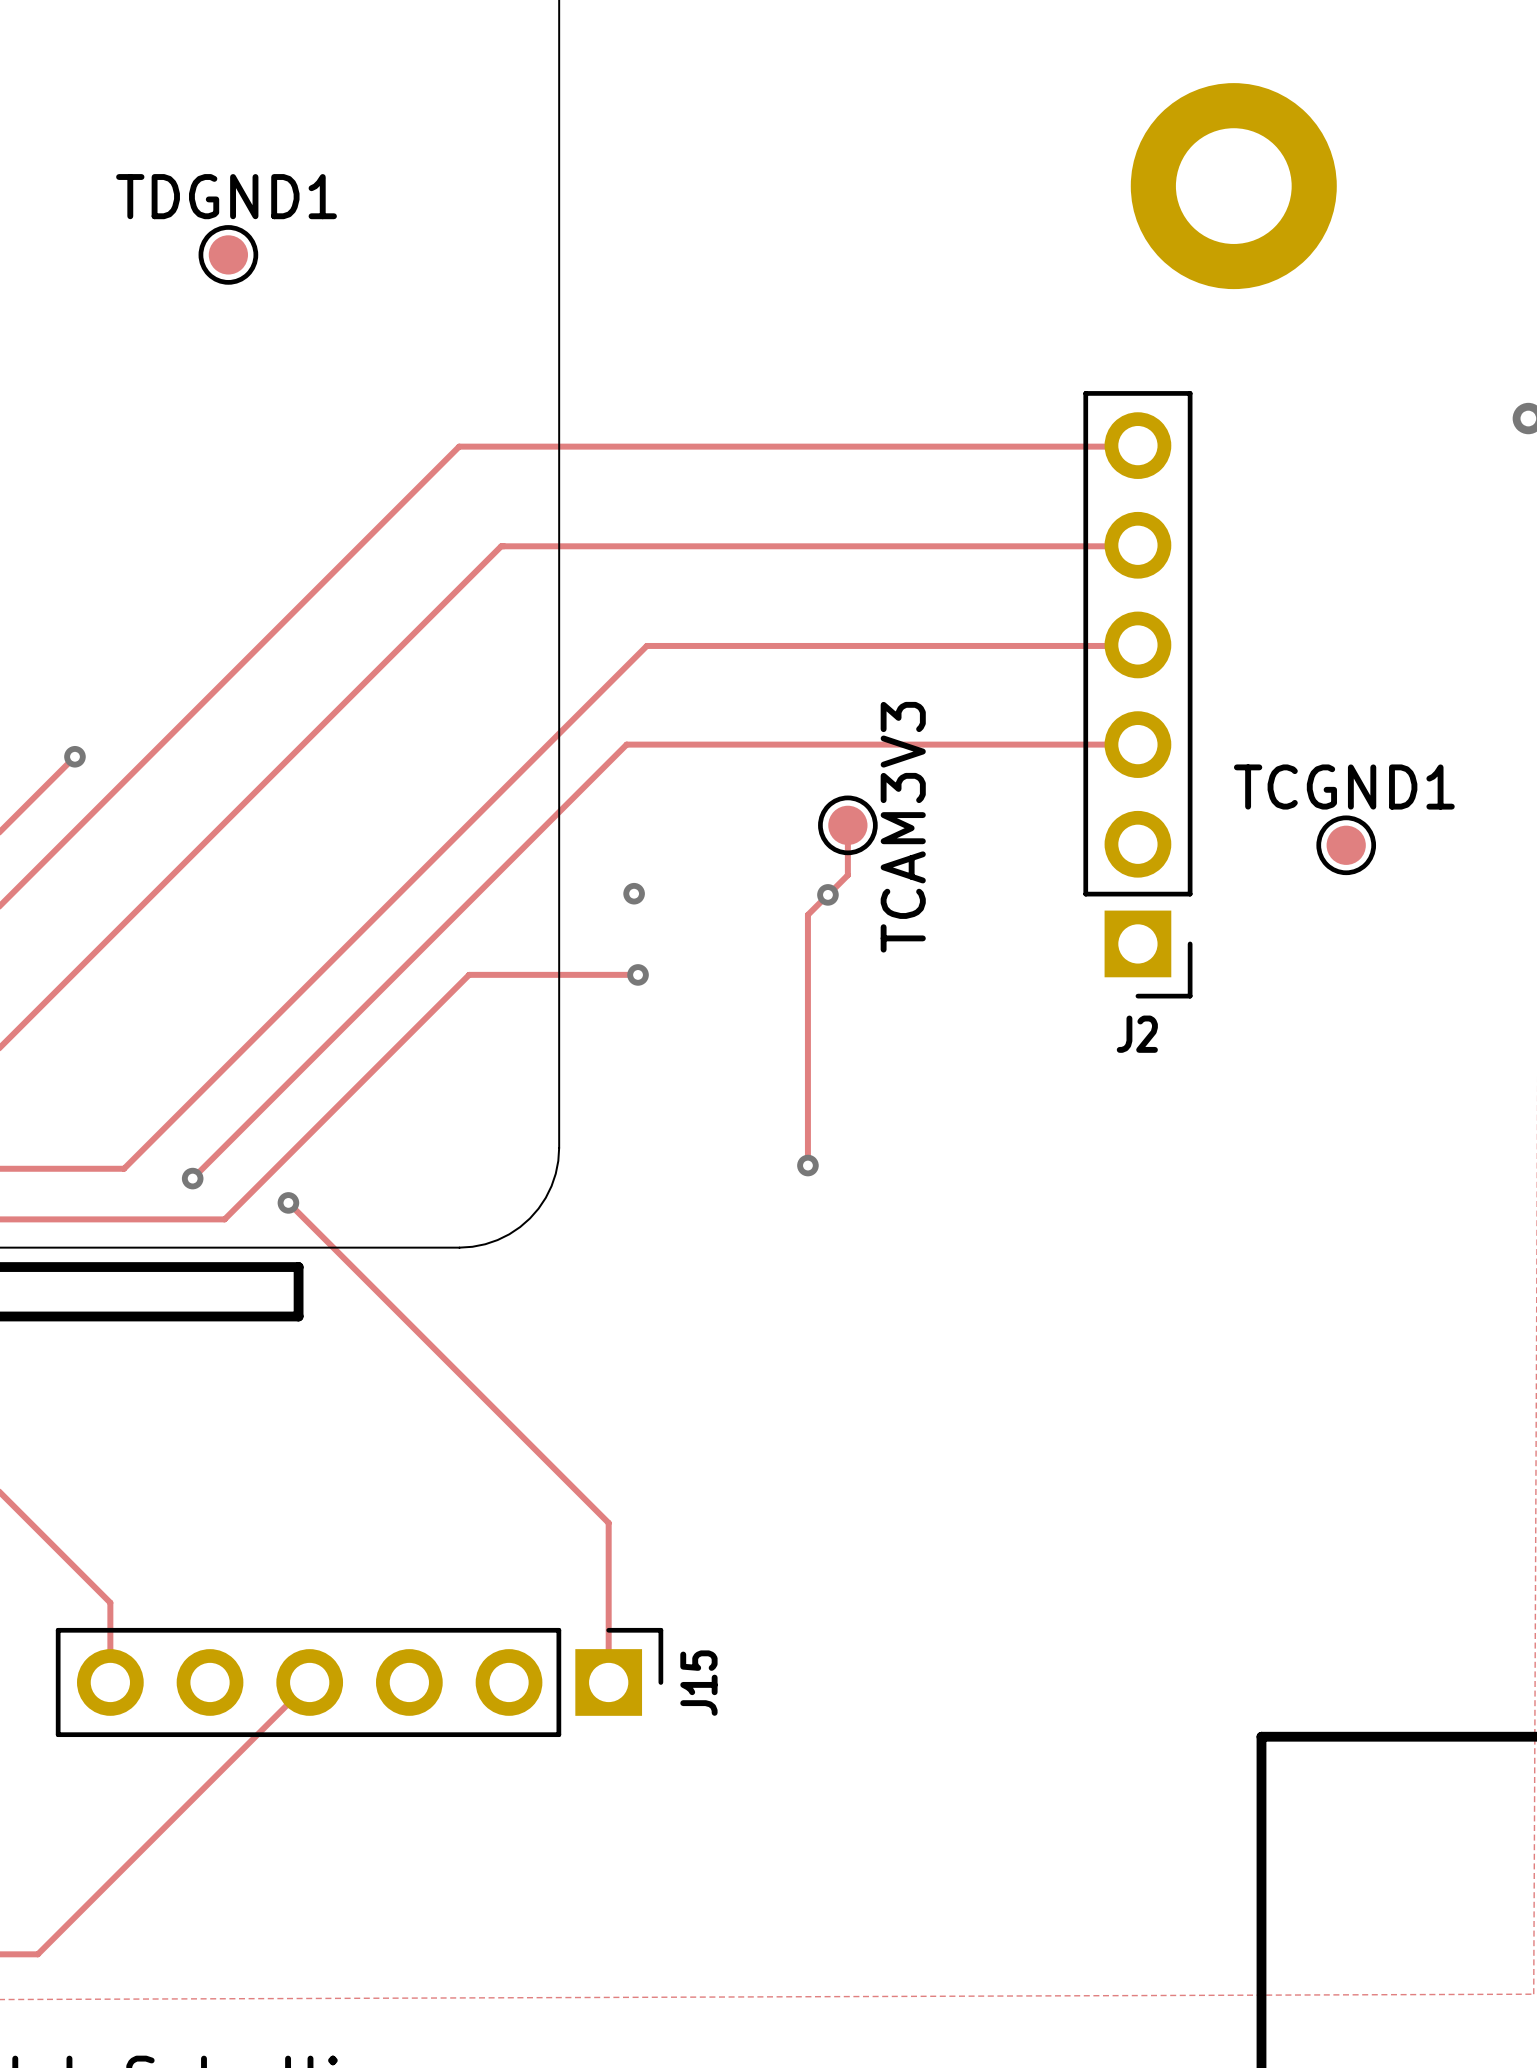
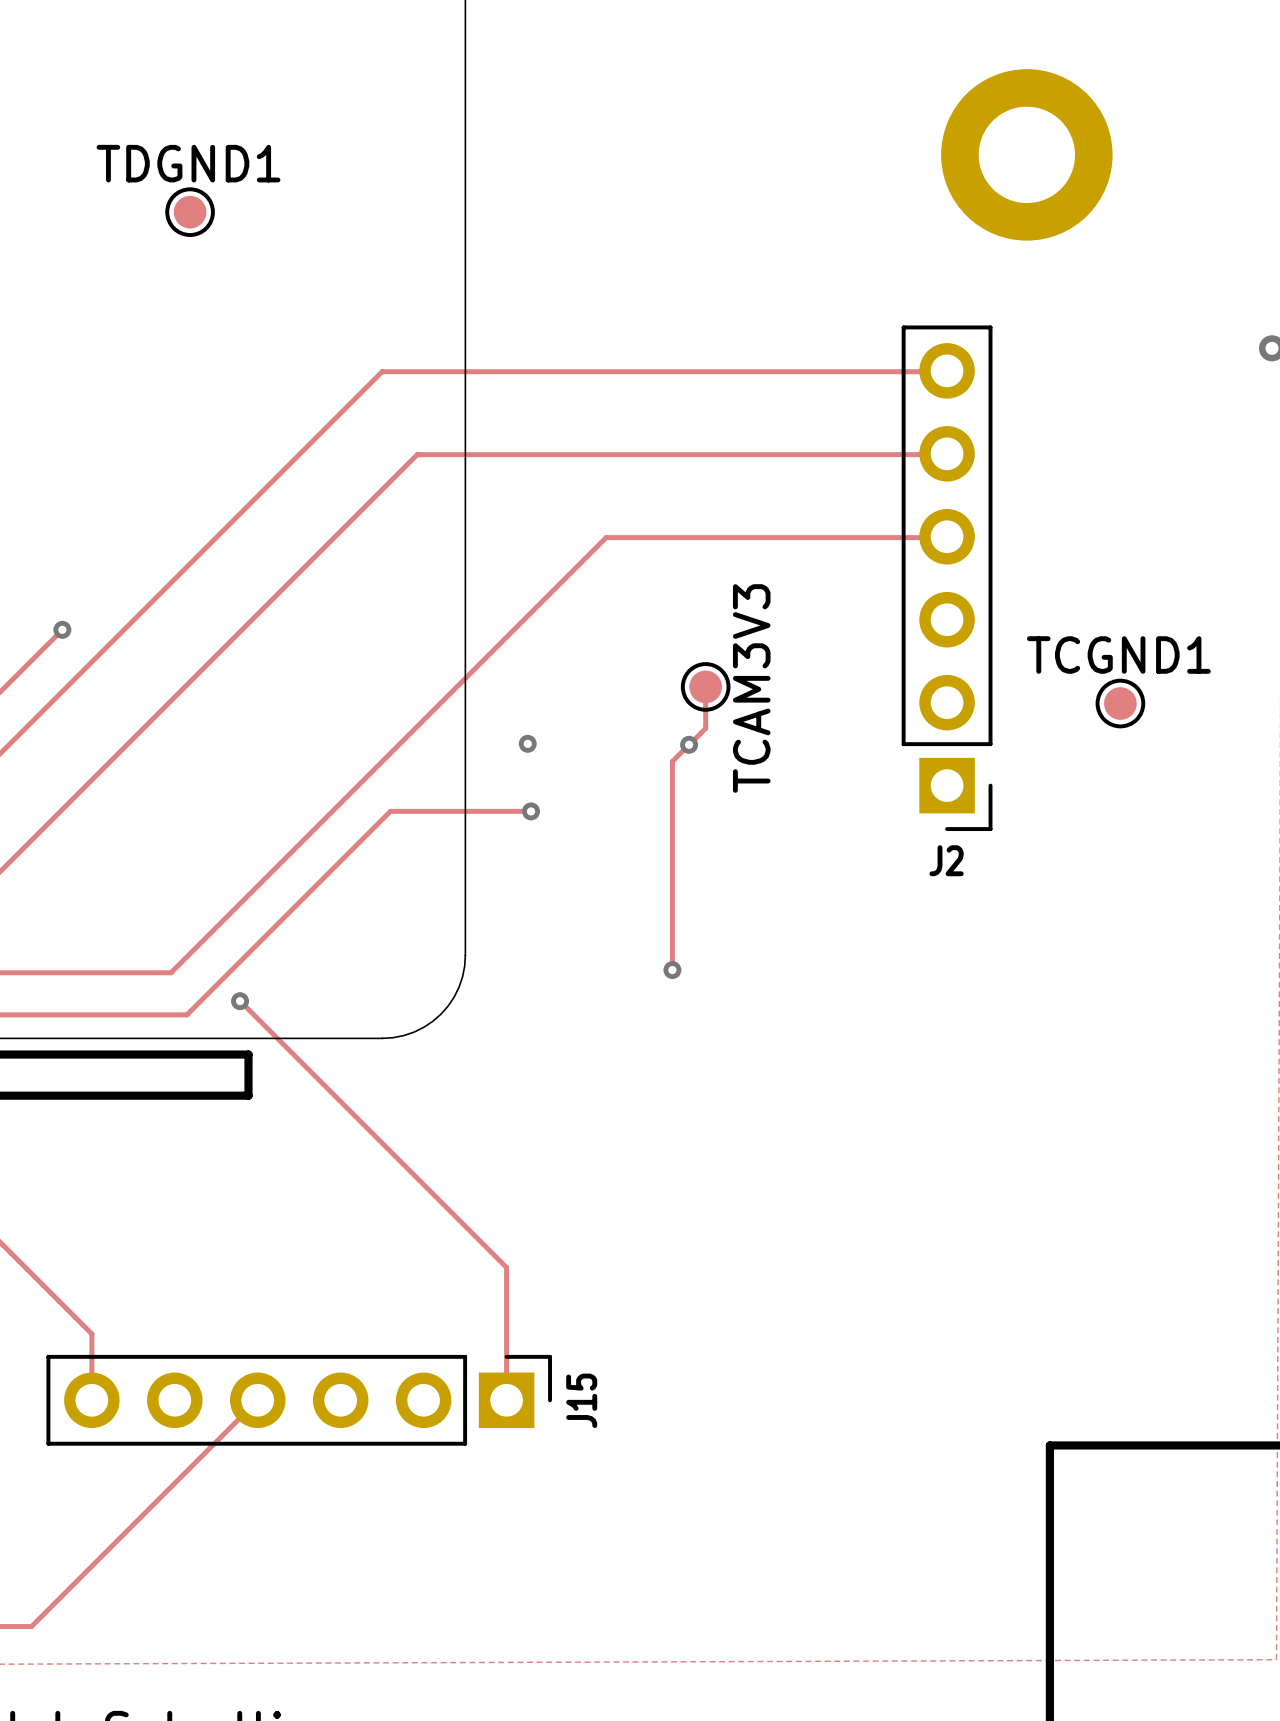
track: (728, 645) (646, 645) (124, 1168) -> (606, 537) (171, 972) (103, 972)
track: (1137, 744) (626, 744) (192, 1178) -> none
via: (192, 1178) -> none

